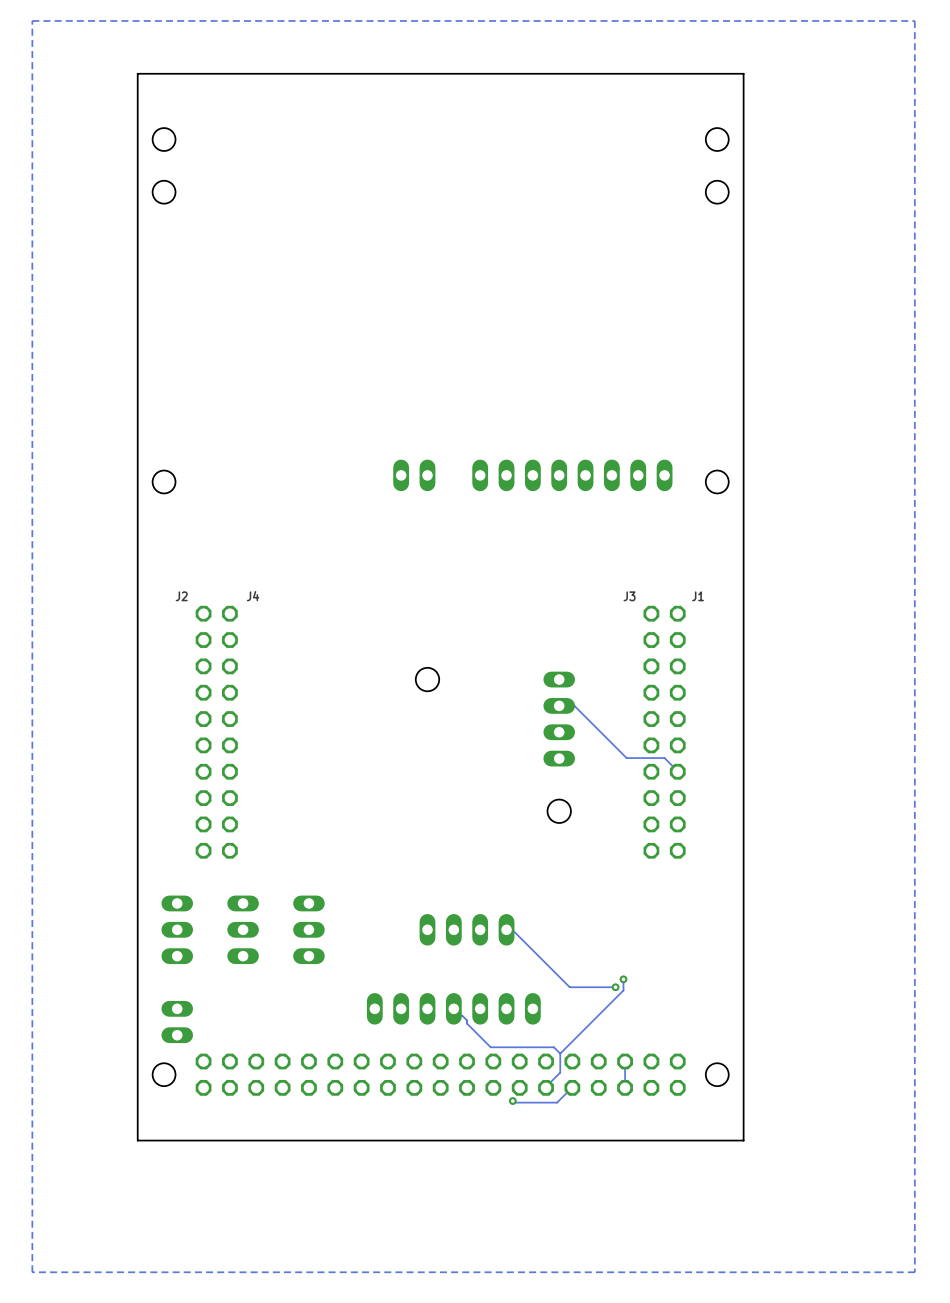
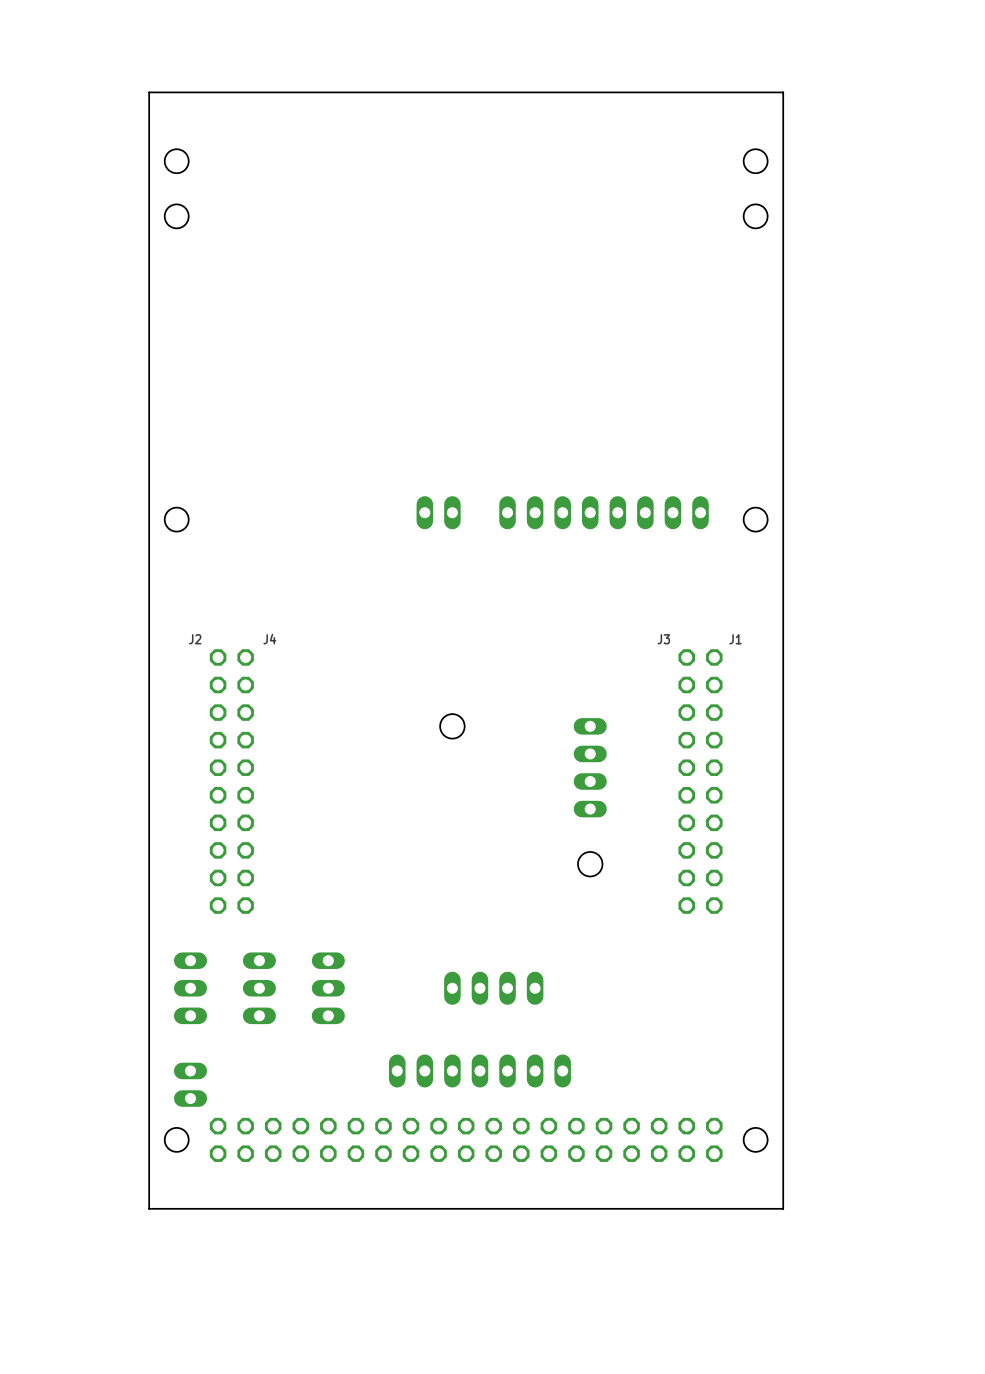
zone outline: (914, 20) (914, 1272) (32, 1272) (32, 20) (914, 20) -> none
track: (559, 705) (574, 705) (626, 758) (664, 758) (677, 771) -> none
track: (506, 929) (512, 930) (569, 987) (615, 987) -> none
track: (623, 979) (623, 990) (560, 1053) -> none
via: (623, 979) -> none
via: (615, 987) -> none
track: (453, 1008) (490, 1047) (553, 1047) (560, 1053) -> none
track: (560, 1053) (560, 1072) (546, 1087) -> none
track: (625, 1061) (625, 1087) -> none
track: (572, 1087) (557, 1102) (514, 1102) (512, 1101) -> none
via: (512, 1101) -> none

